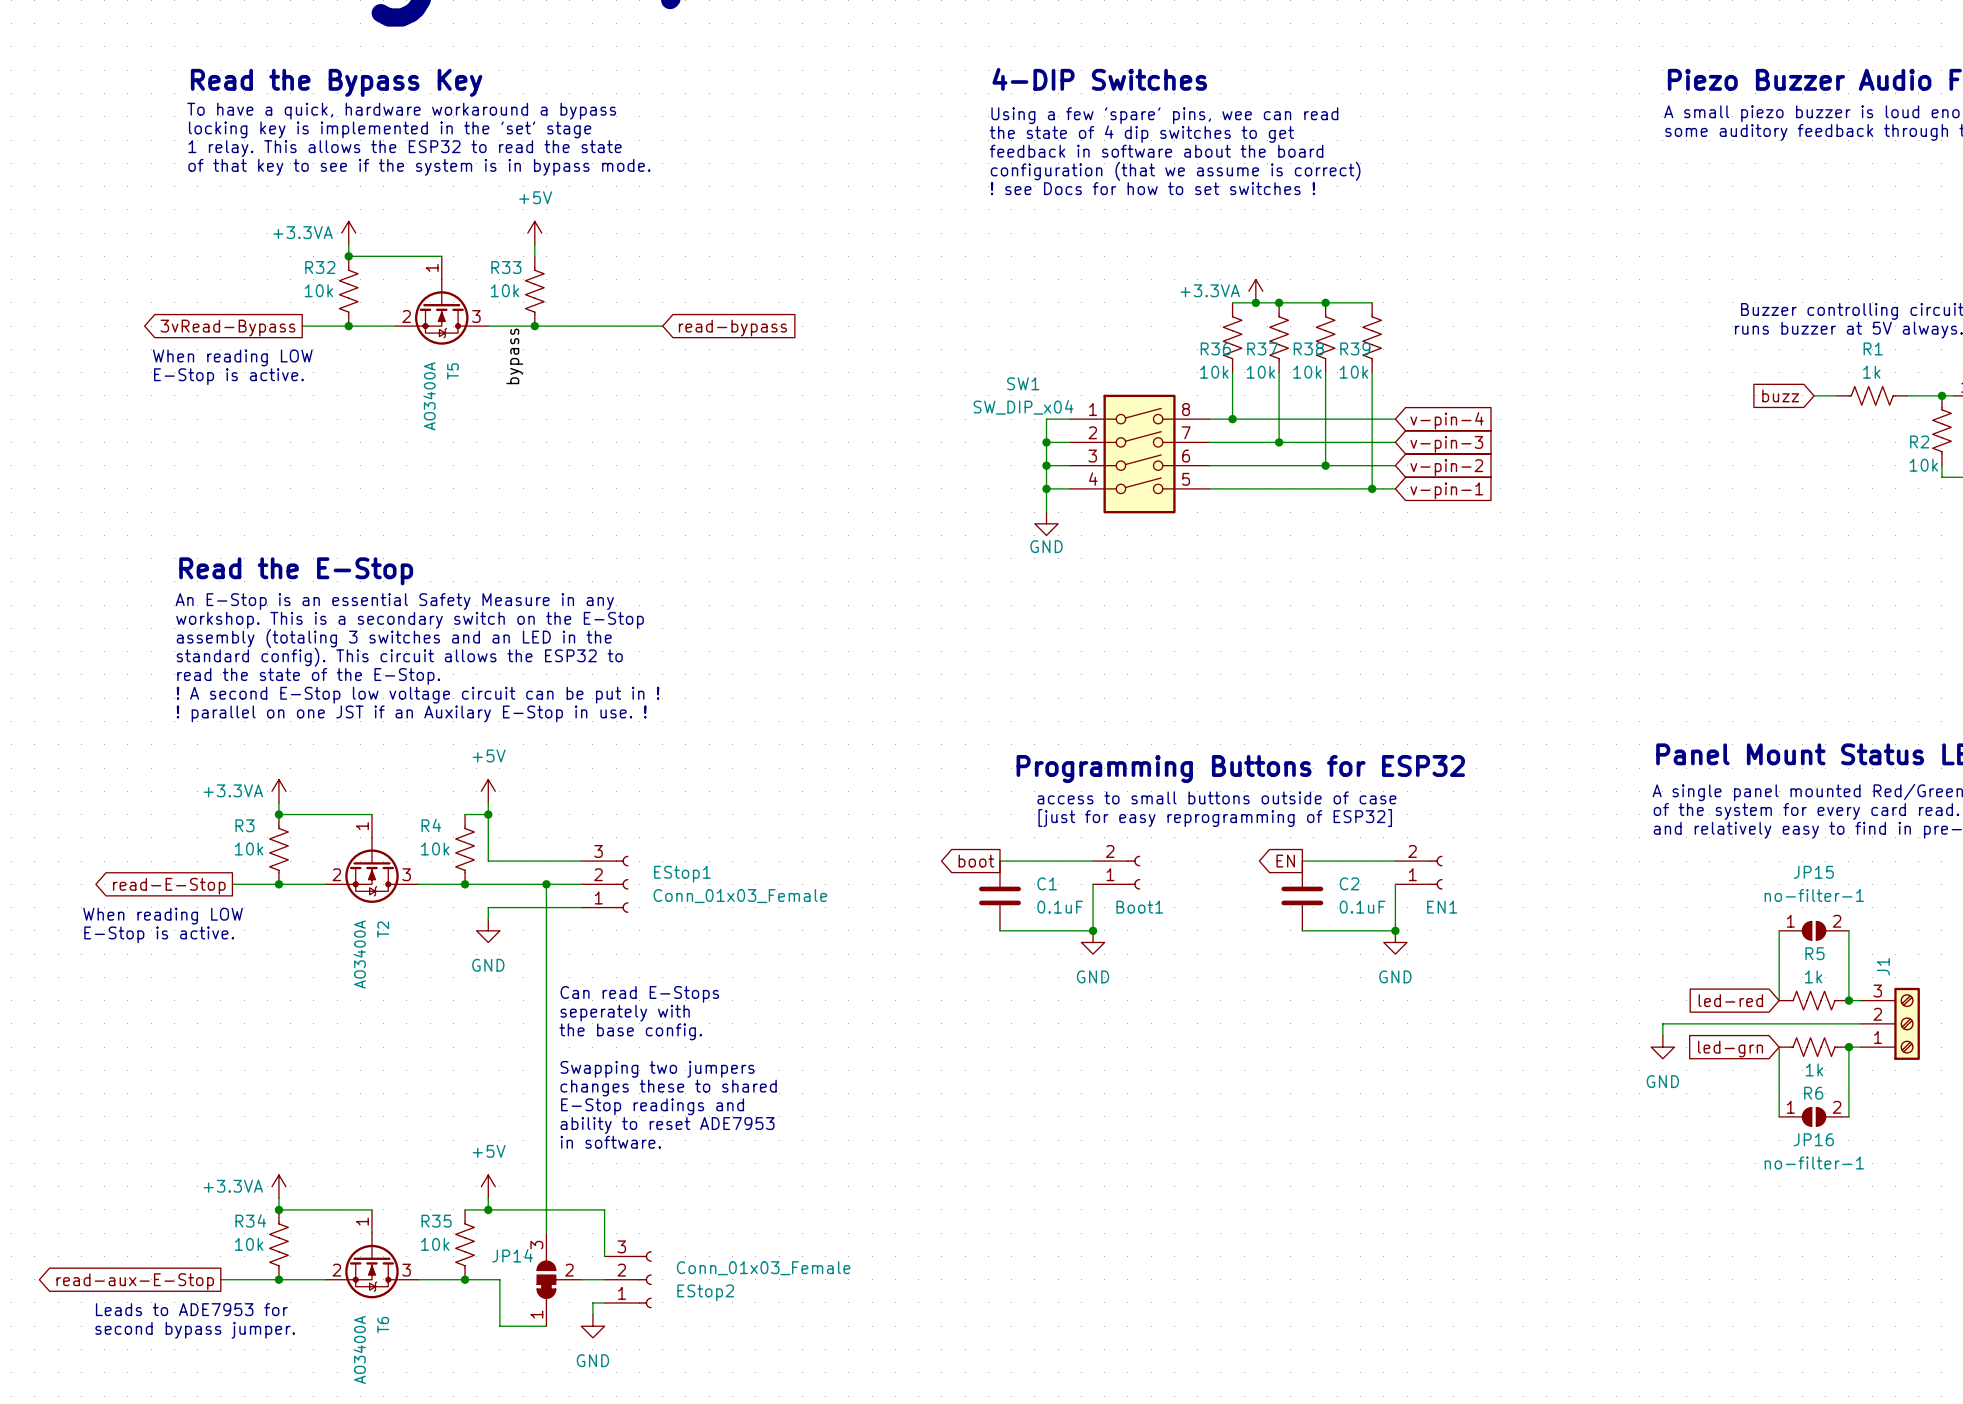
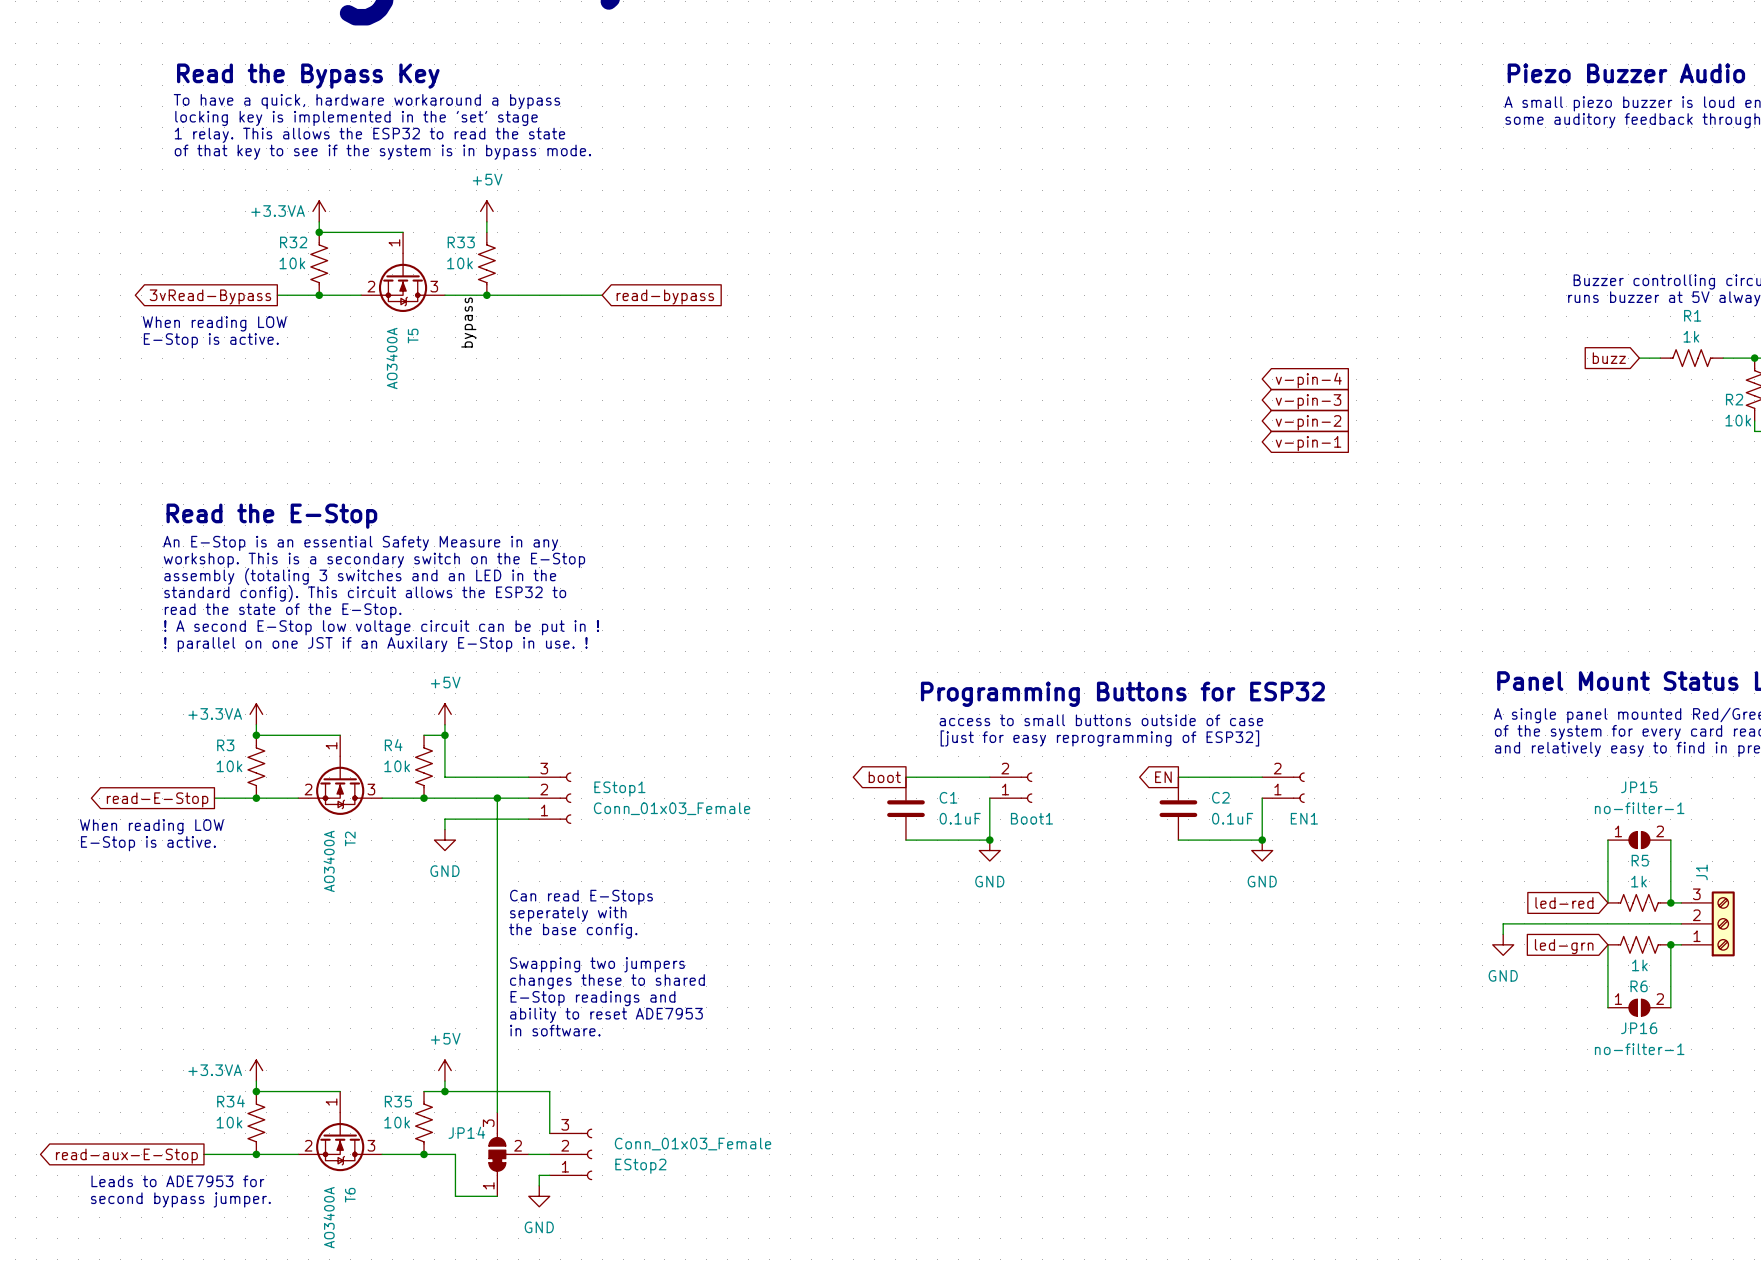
text: 4-DIP Switches (1099, 79) -> none
text: Using a few 'spare' pins, wee can read (1164, 115) -> none
text: the state of 4 dip switches to get (1141, 134) -> none
text: feedback in software about the board (1156, 151) -> none
text: configuration (that we assume is correct) (1175, 171) -> none
text: ! see Docs for how to set switches ! (1152, 188) -> none
power symbol: +3.3VA (1255, 291) -> none
wire: (1232, 302) (1372, 302) -> none
junction: (1255, 302) -> none
junction: (1279, 302) -> none
junction: (1325, 302) -> none
R36: 10k (1232, 337) -> none
R37: 10k (1279, 337) -> none
R38: 10k (1325, 337) -> none
R39: 10k (1372, 337) -> none
wire: (1232, 372) (1232, 419) -> none
wire: (1279, 372) (1279, 442) -> none
wire: (1325, 372) (1325, 465) -> none
wire: (1372, 372) (1372, 488) -> none
wire: (1069, 419) (1046, 419) (1046, 512) -> none
wire: (1209, 419) (1395, 419) -> none
junction: (1232, 419) -> none
wire: (1046, 442) (1069, 442) -> none
junction: (1046, 442) -> none
wire: (1209, 442) (1395, 442) -> none
junction: (1279, 442) -> none
SW1: SW_DIP_x04 (1139, 454) -> none
wire: (1046, 465) (1069, 465) -> none
junction: (1046, 465) -> none
wire: (1209, 465) (1395, 465) -> none
junction: (1325, 465) -> none
wire: (1046, 488) (1069, 488) -> none
junction: (1046, 488) -> none
wire: (1209, 488) (1395, 488) -> none
junction: (1372, 488) -> none
power symbol: GND (1046, 523) -> none

